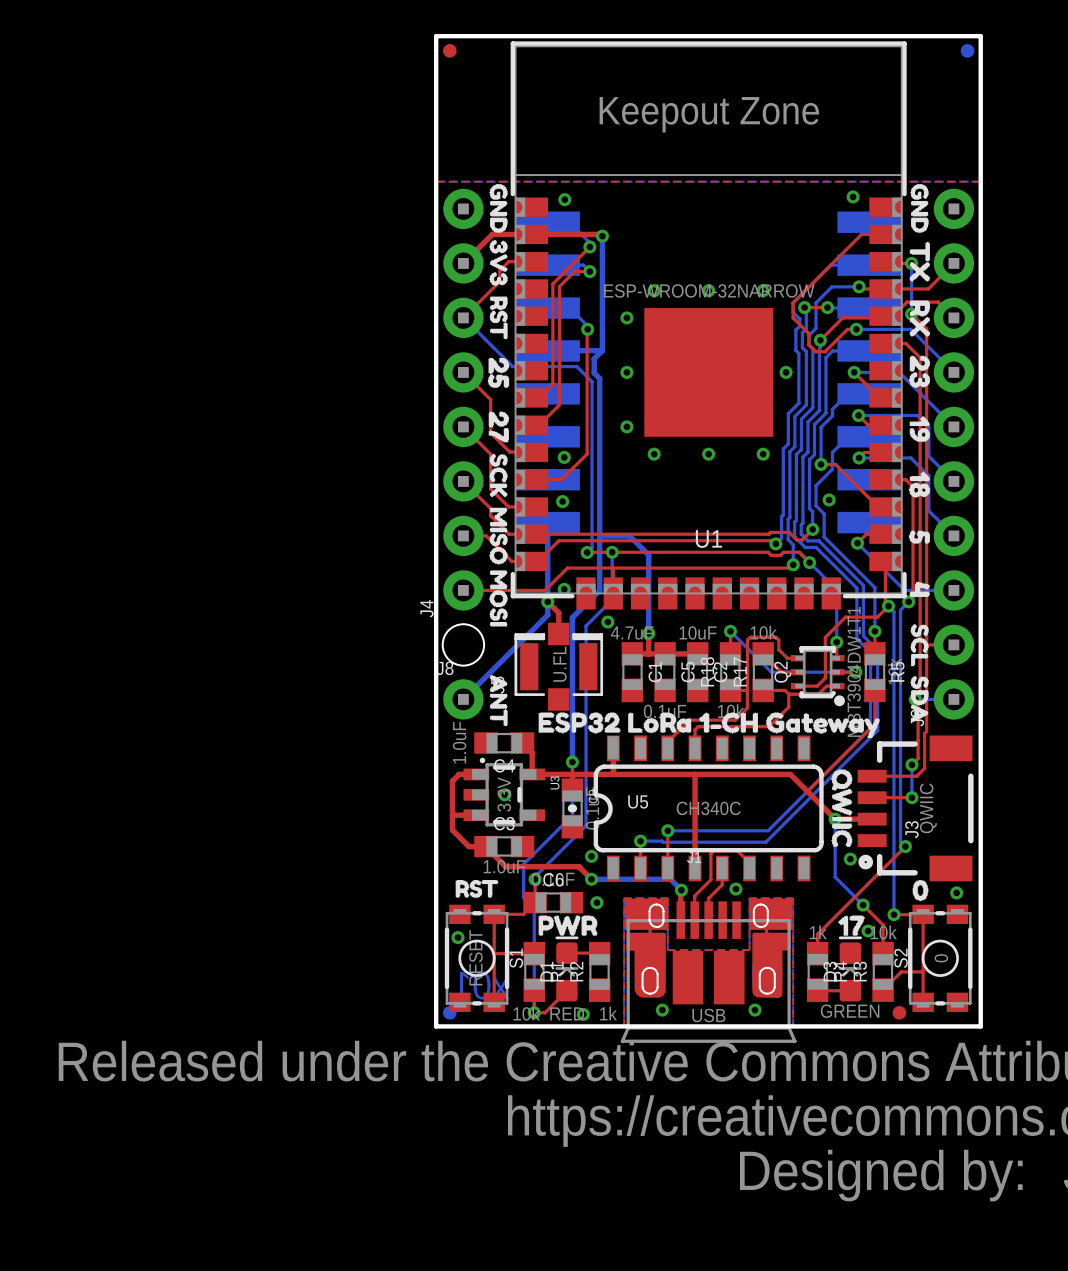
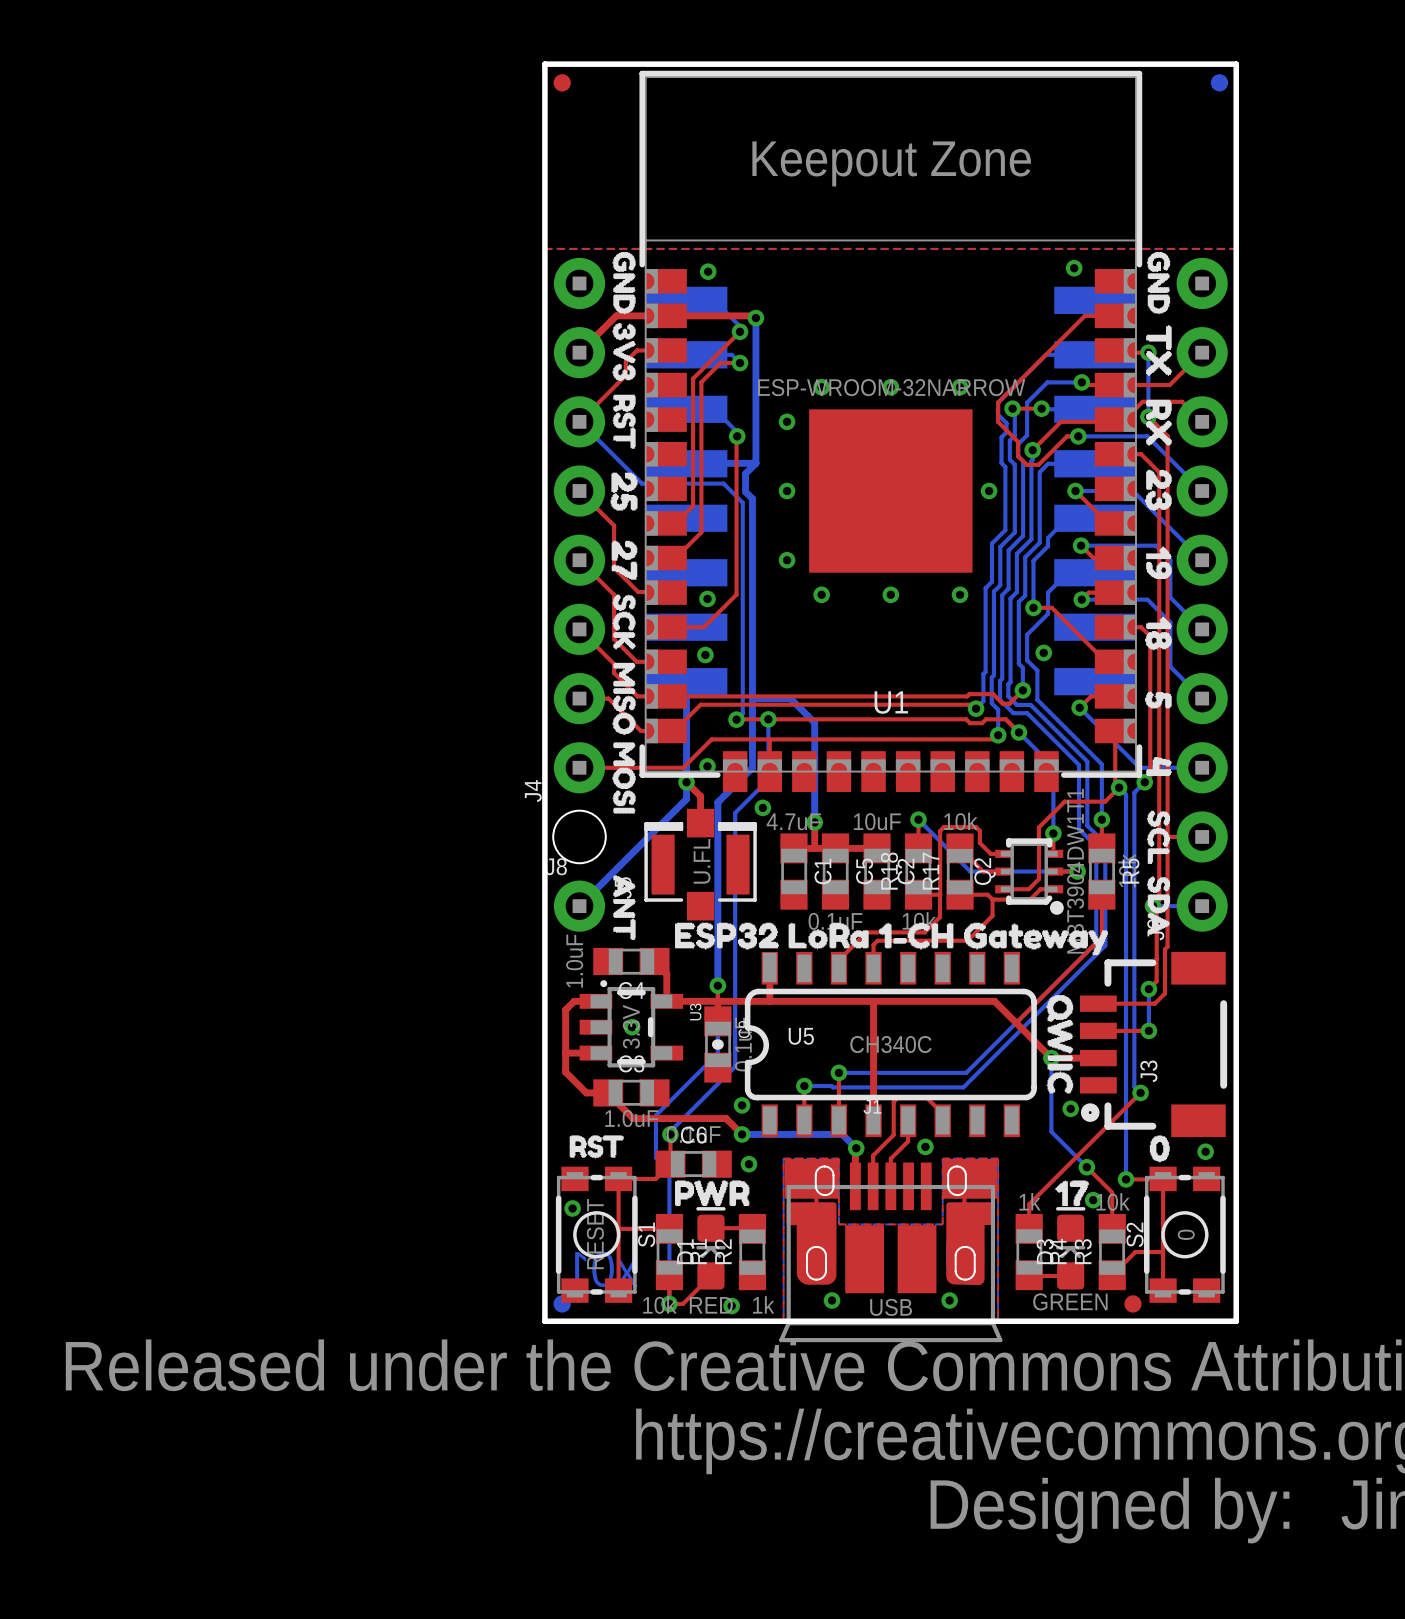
J3 value: QWIIC (928, 808) -> none

